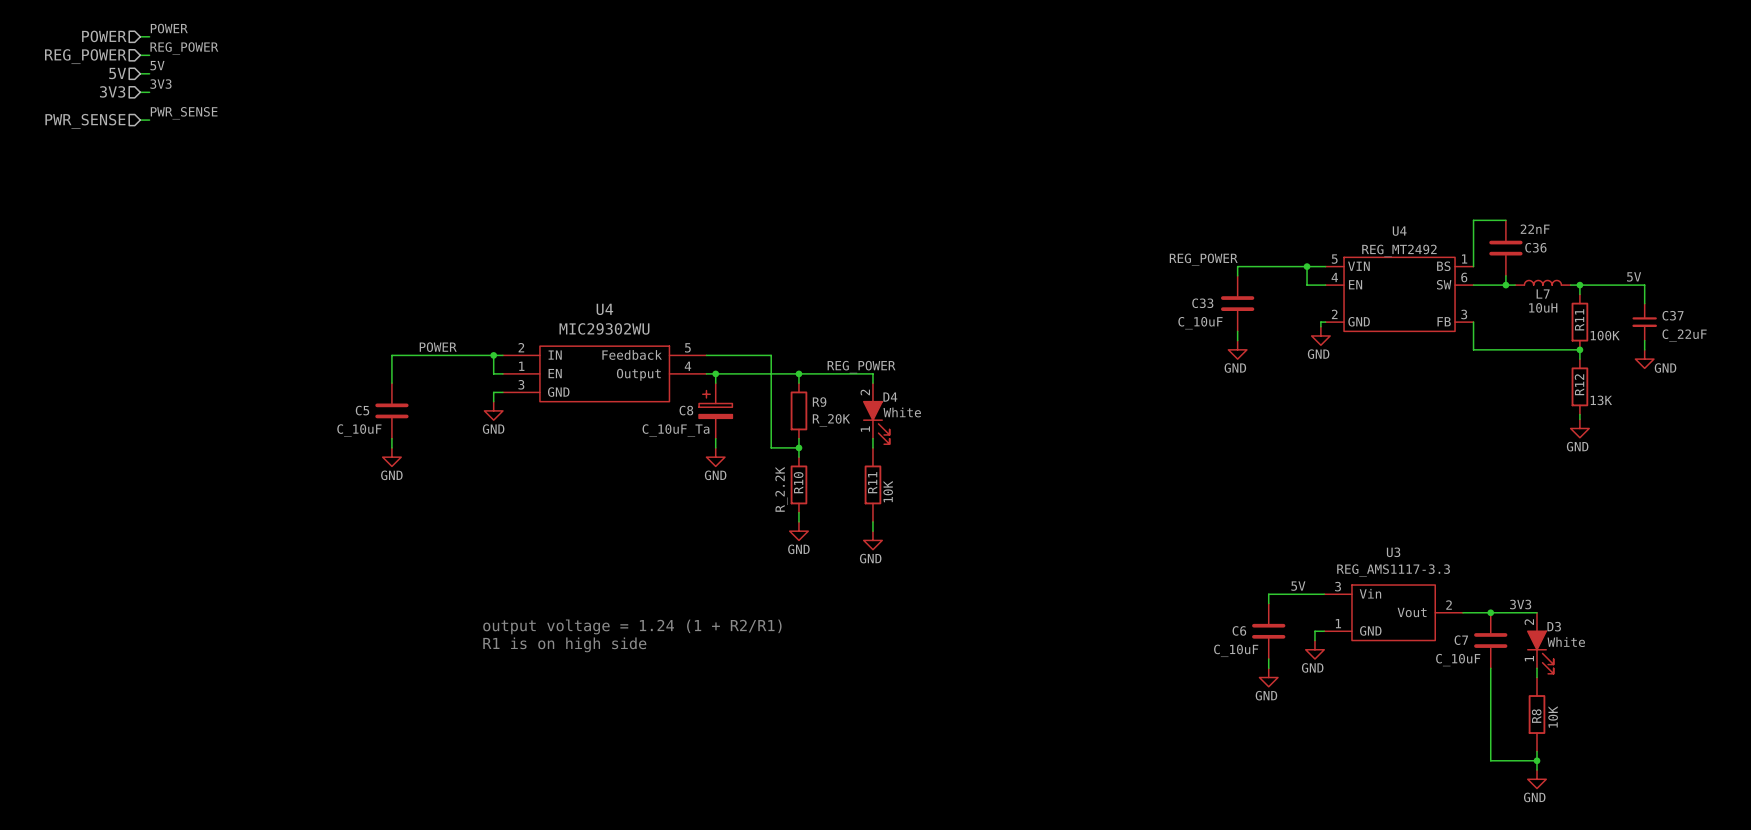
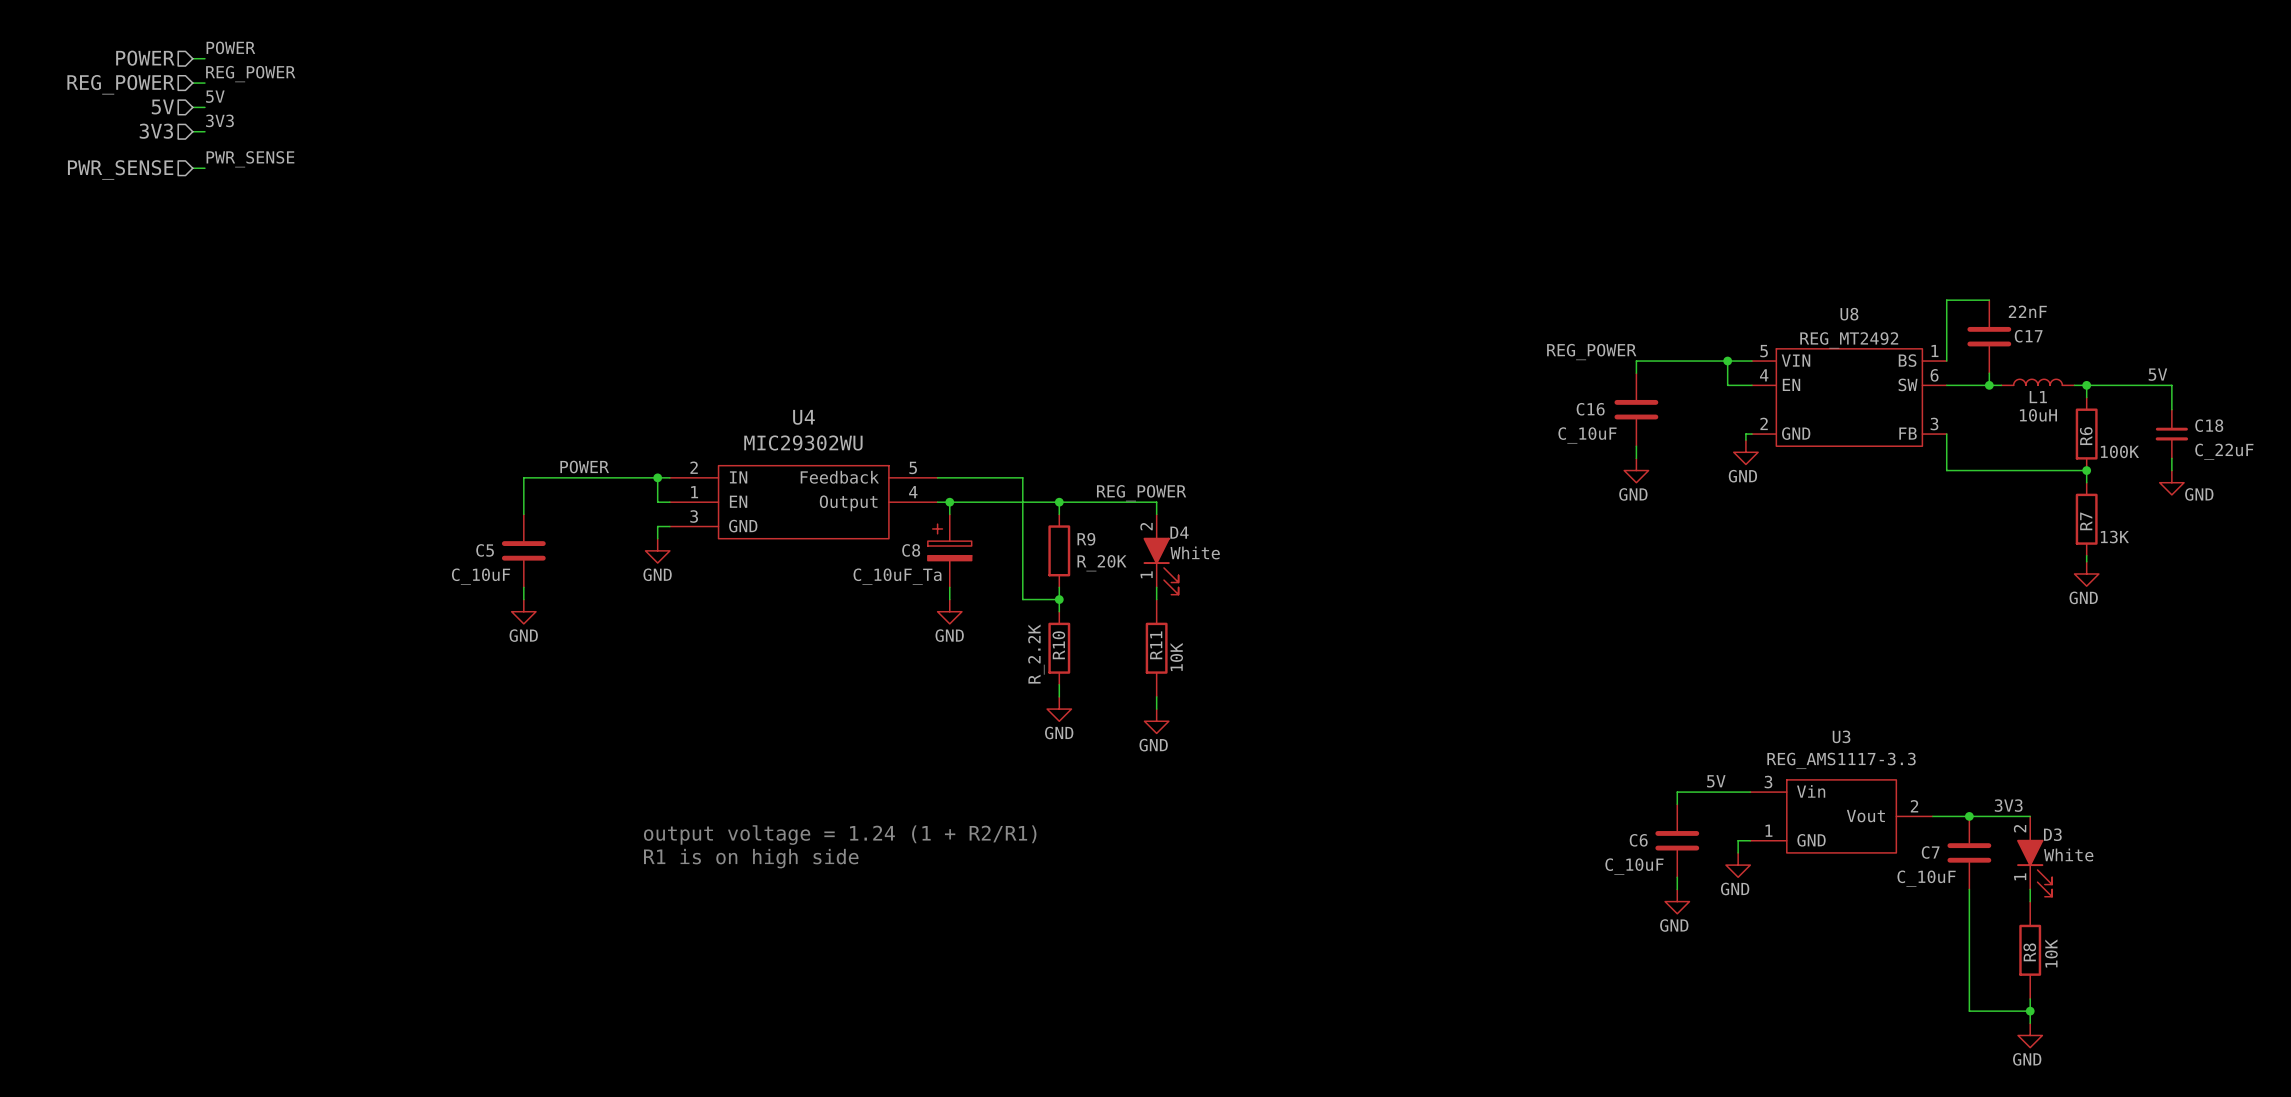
U4 name: U4 (1399, 231) -> U8 (1849, 314)
C36 name: C36 (1535, 247) -> C17 (2028, 336)
L7 name: L7 (1543, 294) -> L1 (2038, 397)
C33 name: C33 (1202, 303) -> C16 (1590, 409)
C37 name: C37 (1673, 315) -> C18 (2209, 425)
R11 name: R11 (1579, 319) -> R6 (2086, 436)
R12 name: R12 (1579, 384) -> R7 (2086, 521)

